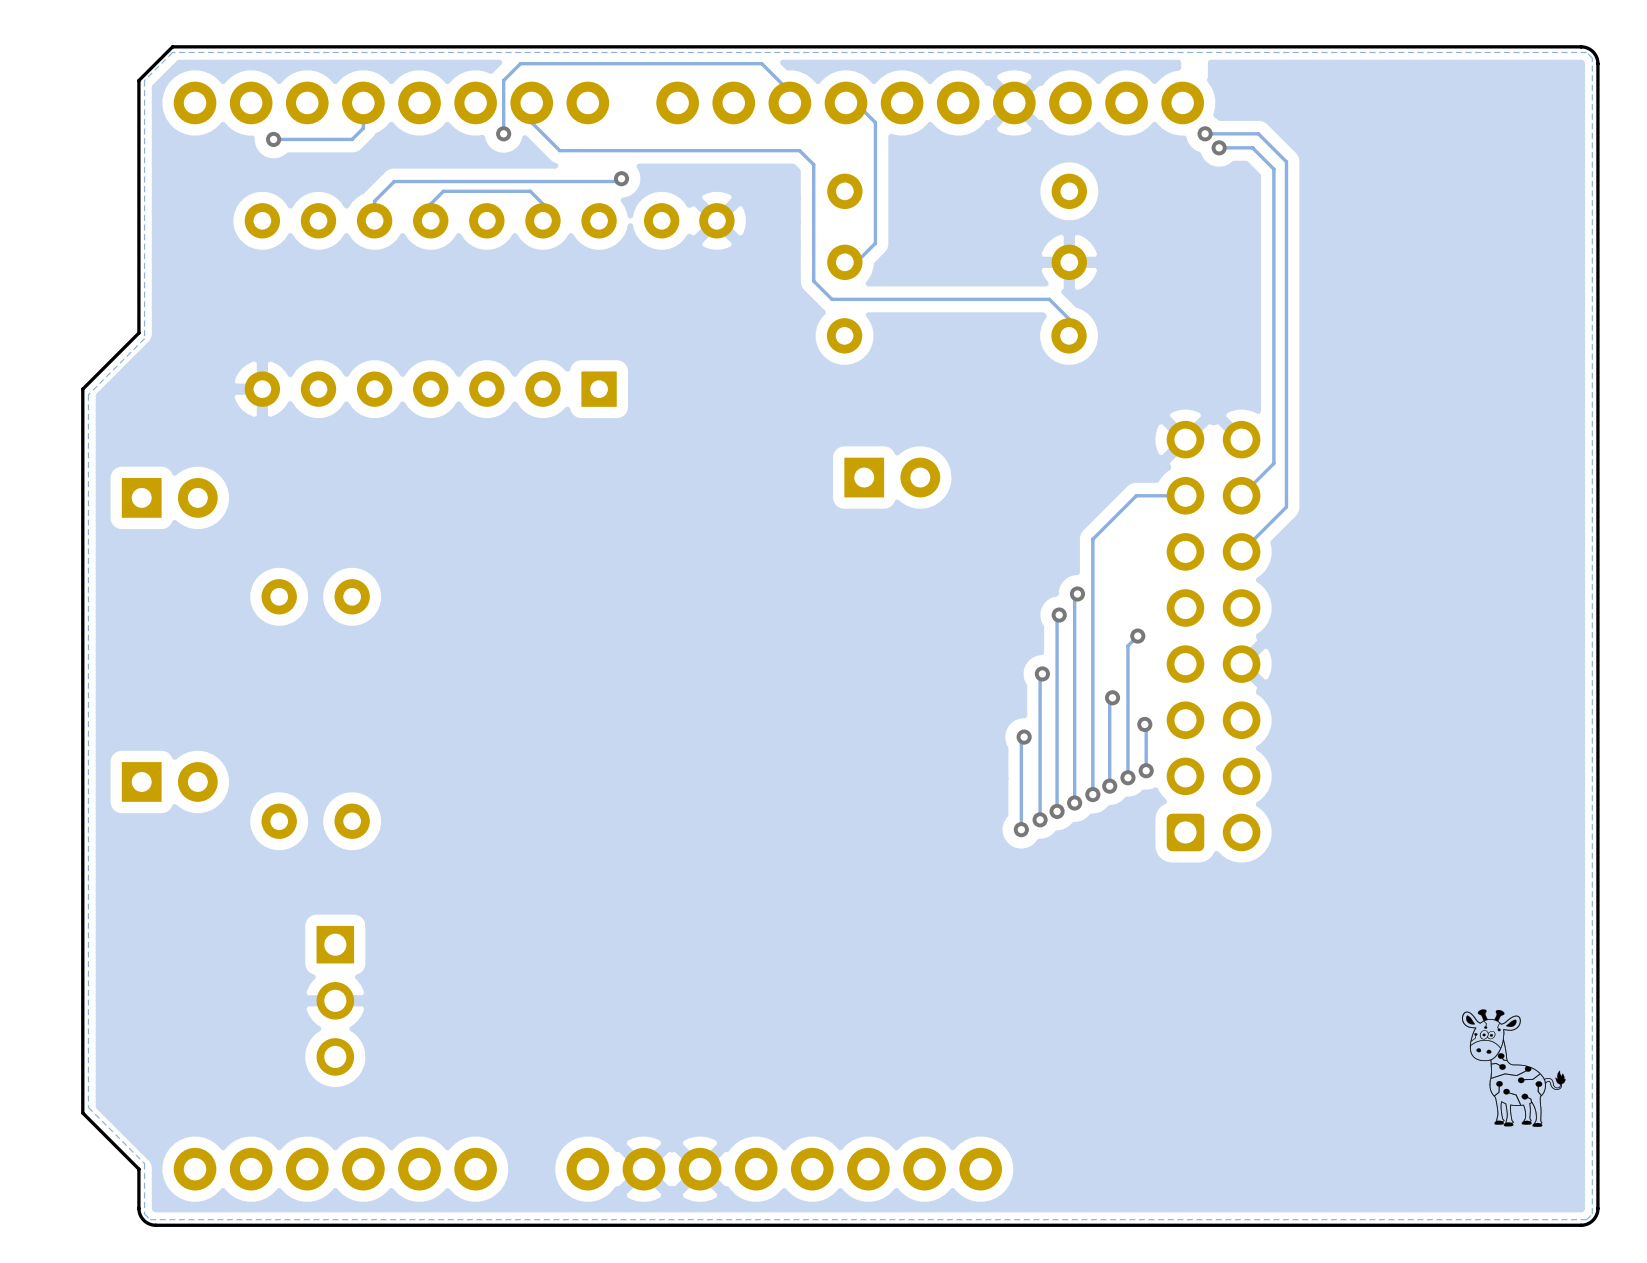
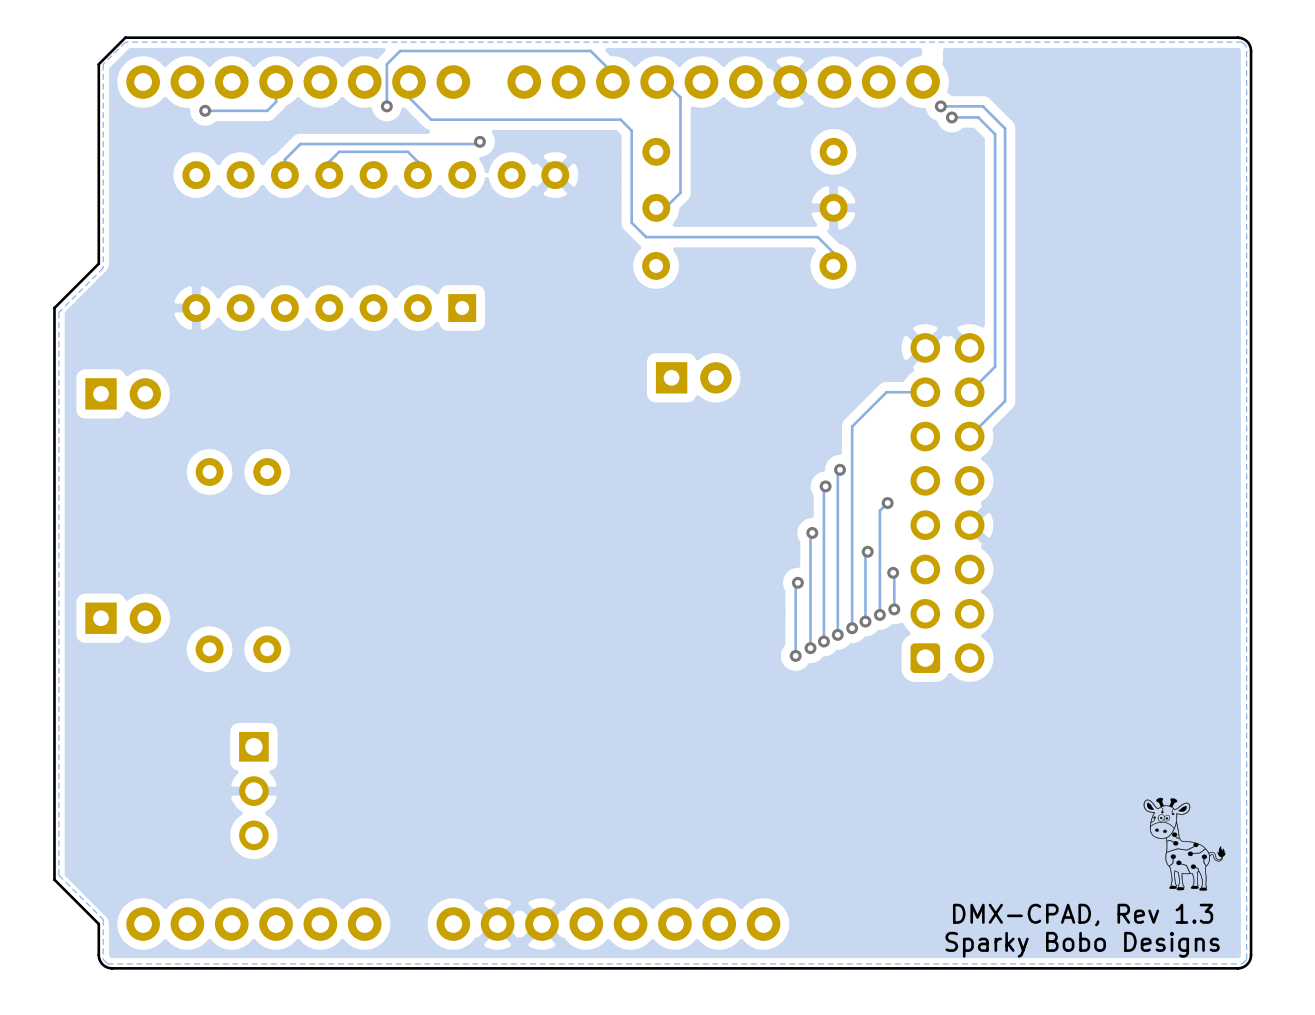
text: none -> DMX-CPAD, Rev 1.3 (1083, 915)
text: none -> Sparky Bobo Designs (1082, 944)

